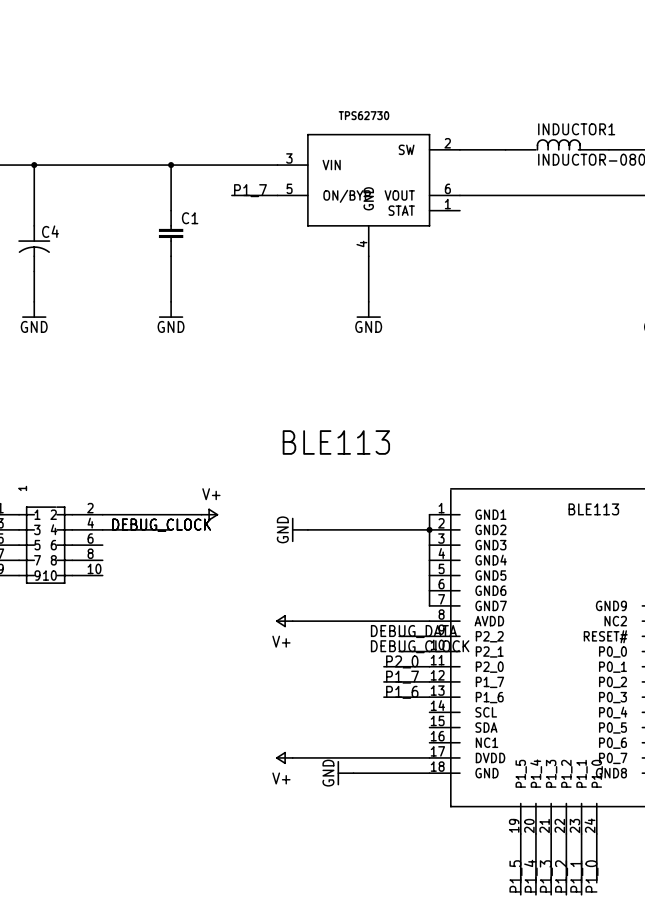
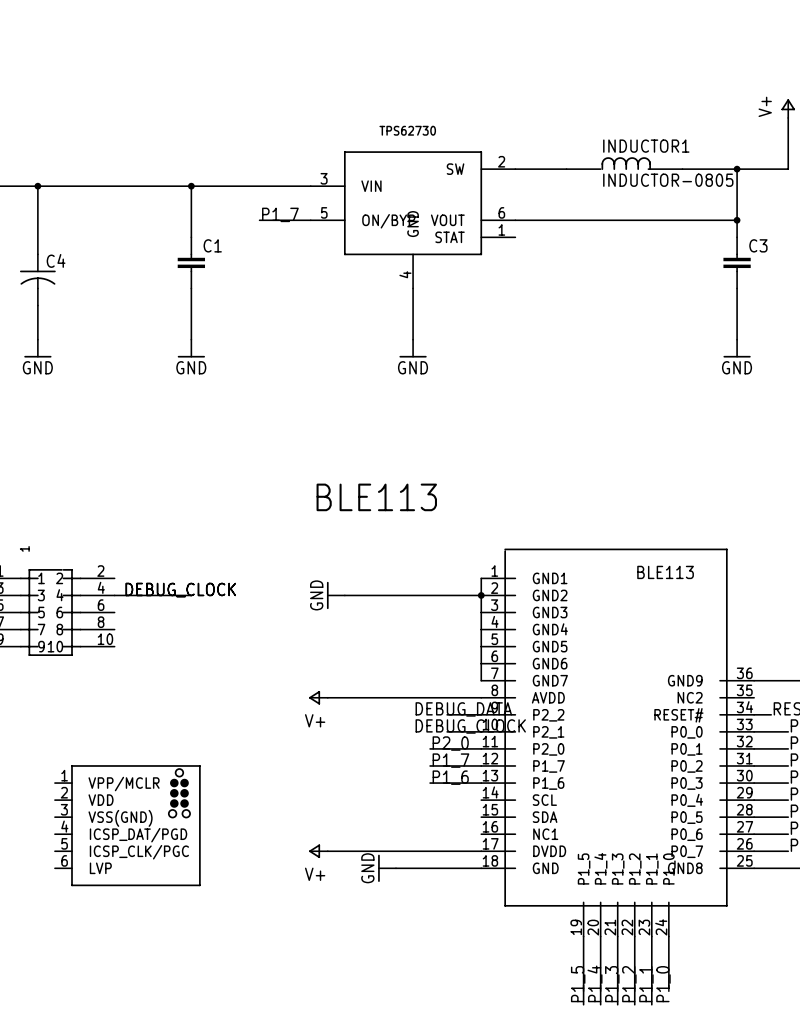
wire: (102, 514) (201, 514) -> none
power symbol: V+ (209, 514) -> none
part: none -> (127, 825)

